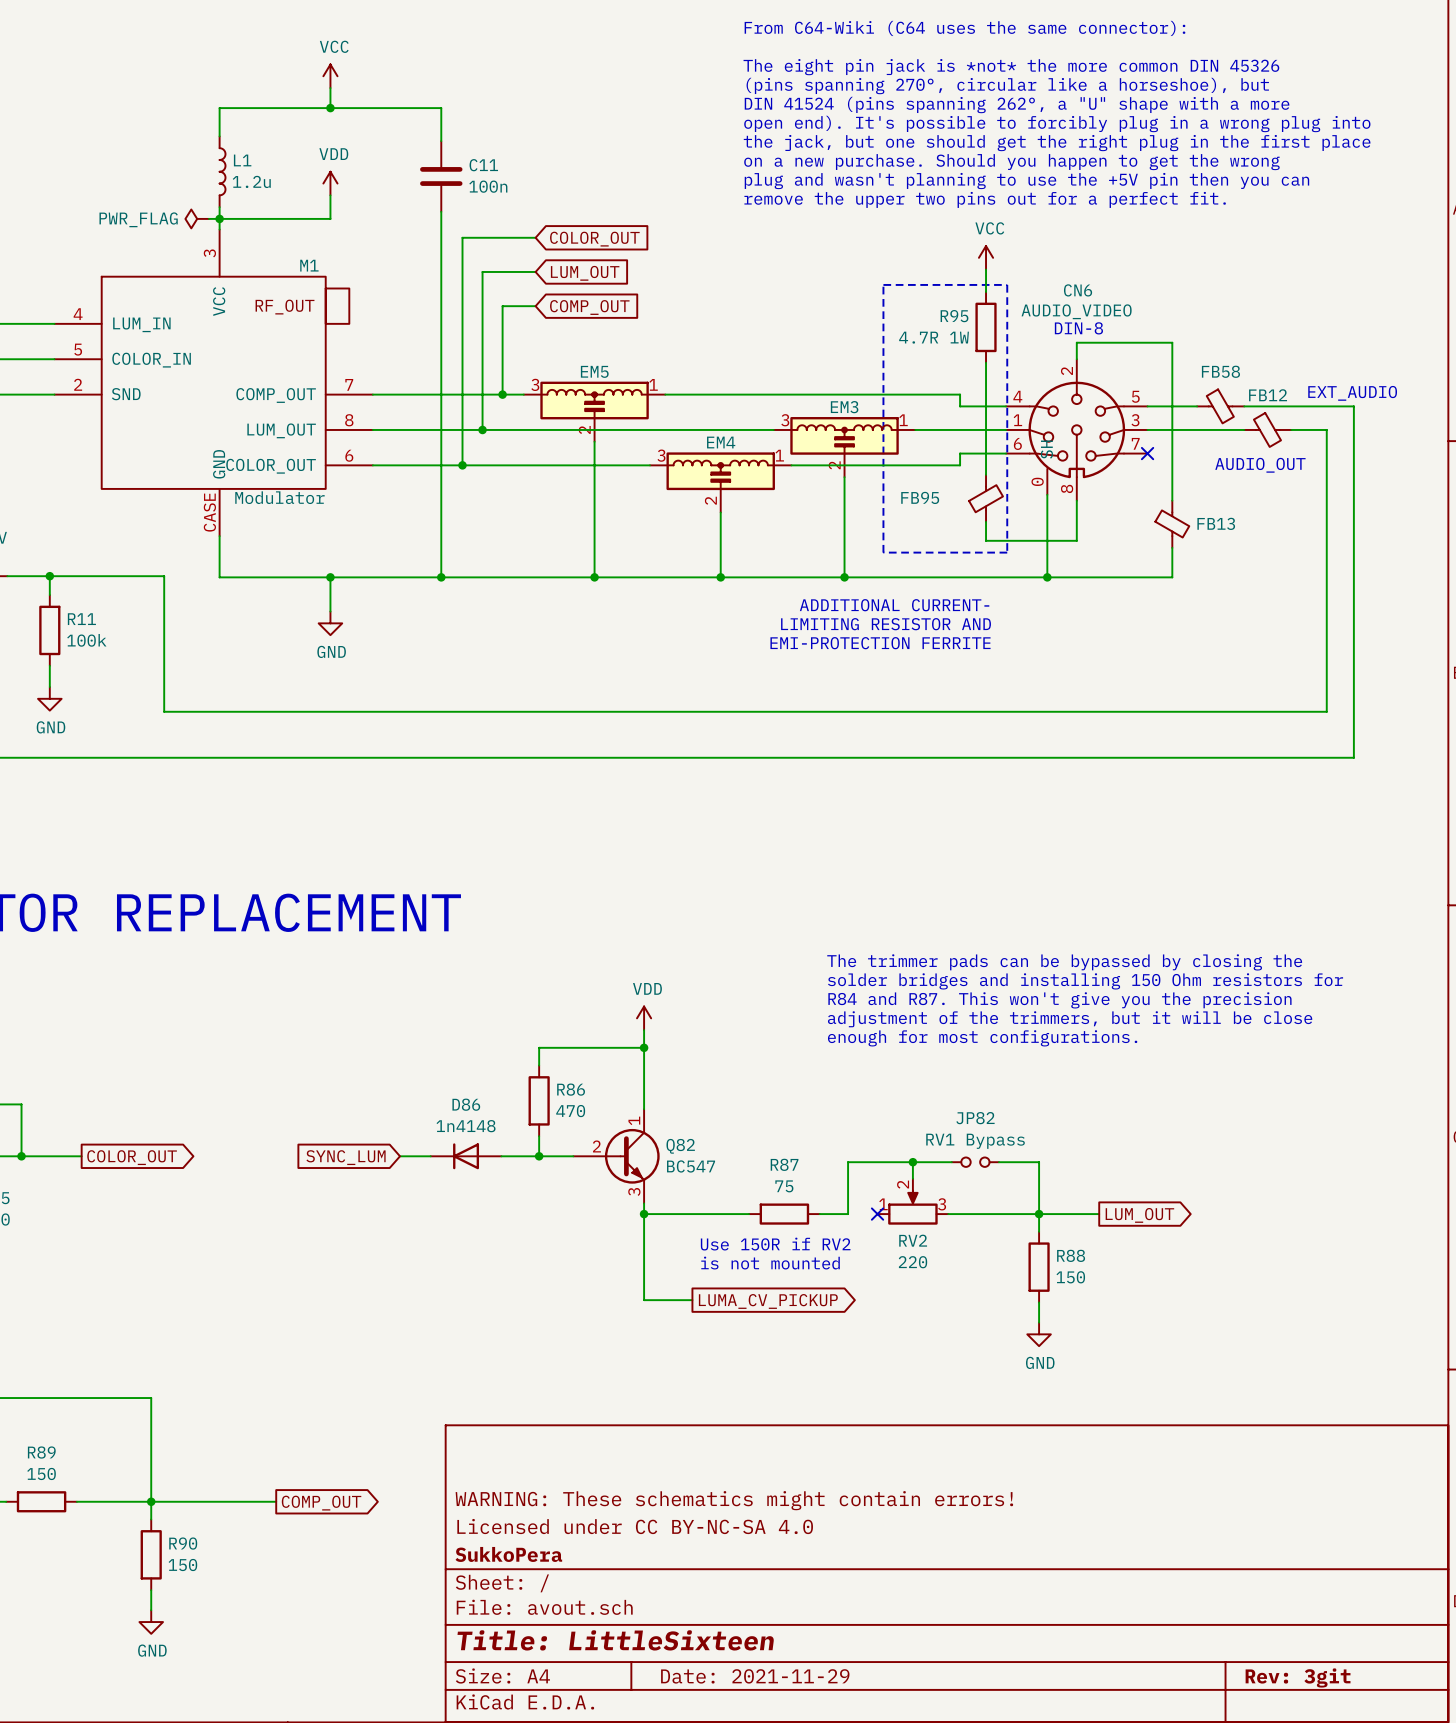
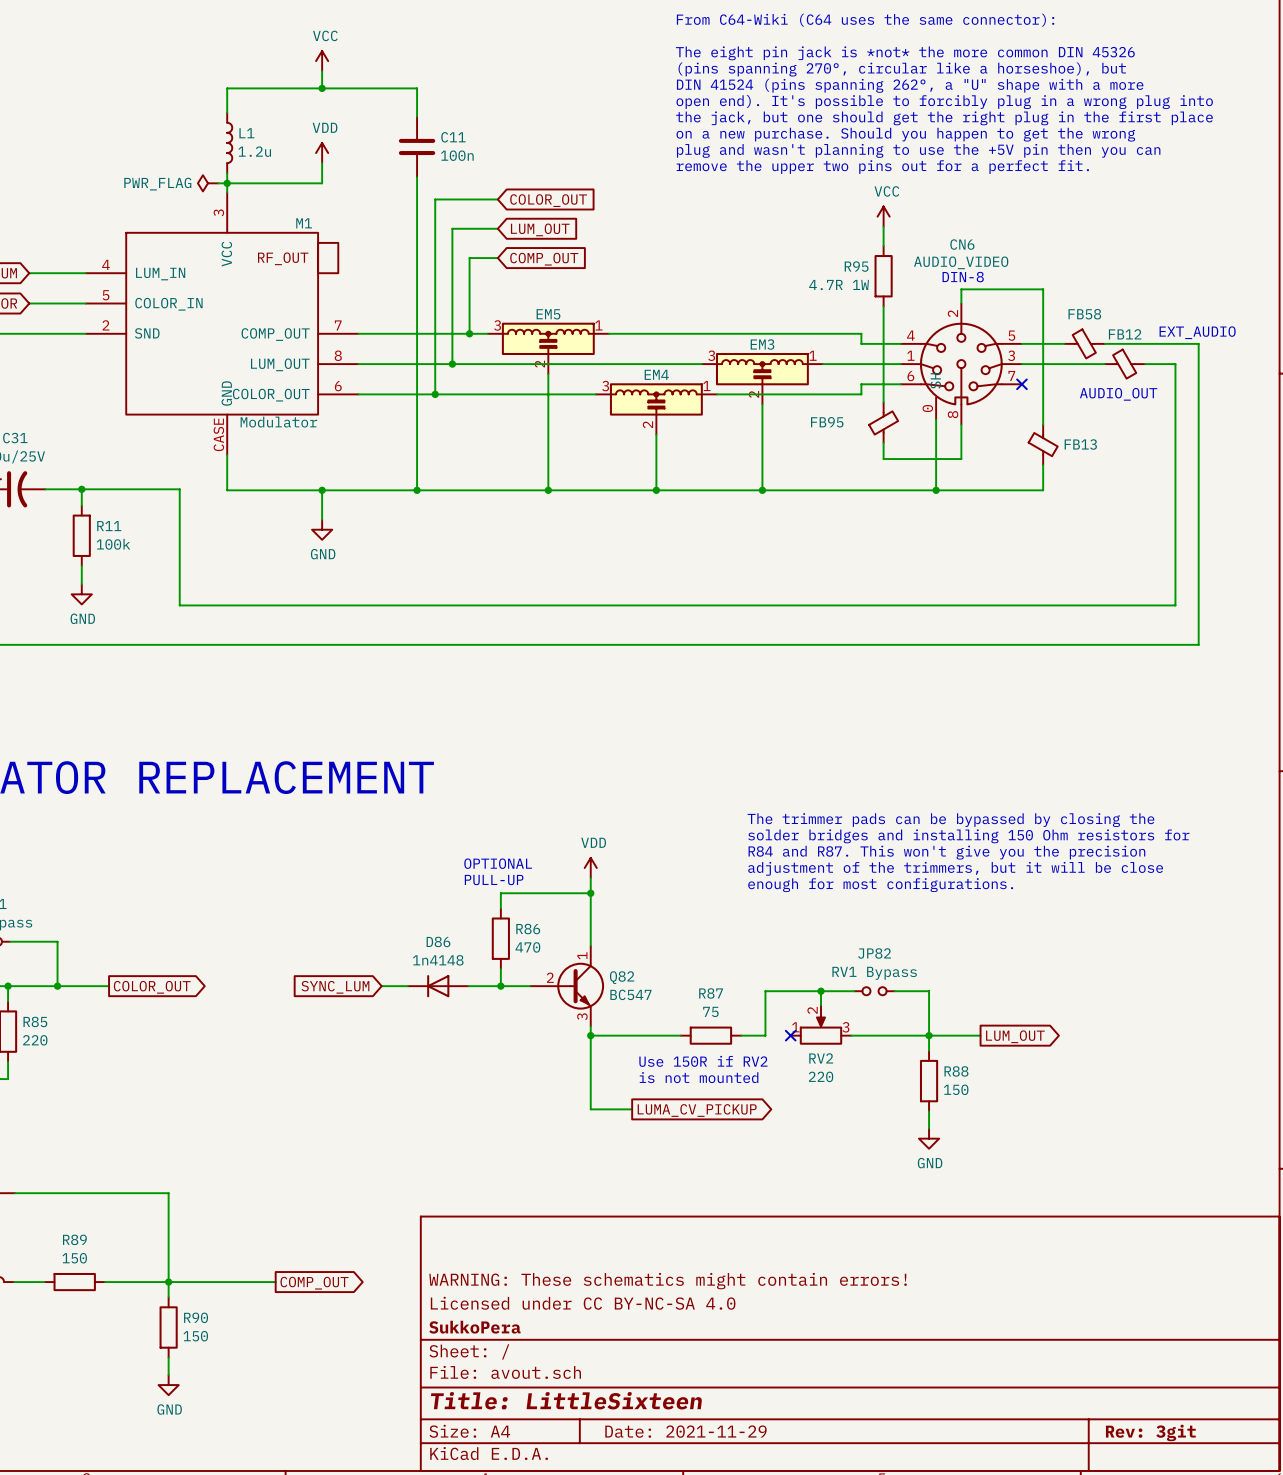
line: (883, 284) (1007, 284) (1007, 552) (883, 552) (883, 284) -> none
text: ADDITIONAL CURRENT- (894, 605) -> none
text: LIMITING RESISTOR AND (886, 624) -> none
text: EMI-PROTECTION FERRITE (880, 643) -> none
text: none -> OPTIONAL (498, 863)
text: none -> PULL-UP (494, 880)

